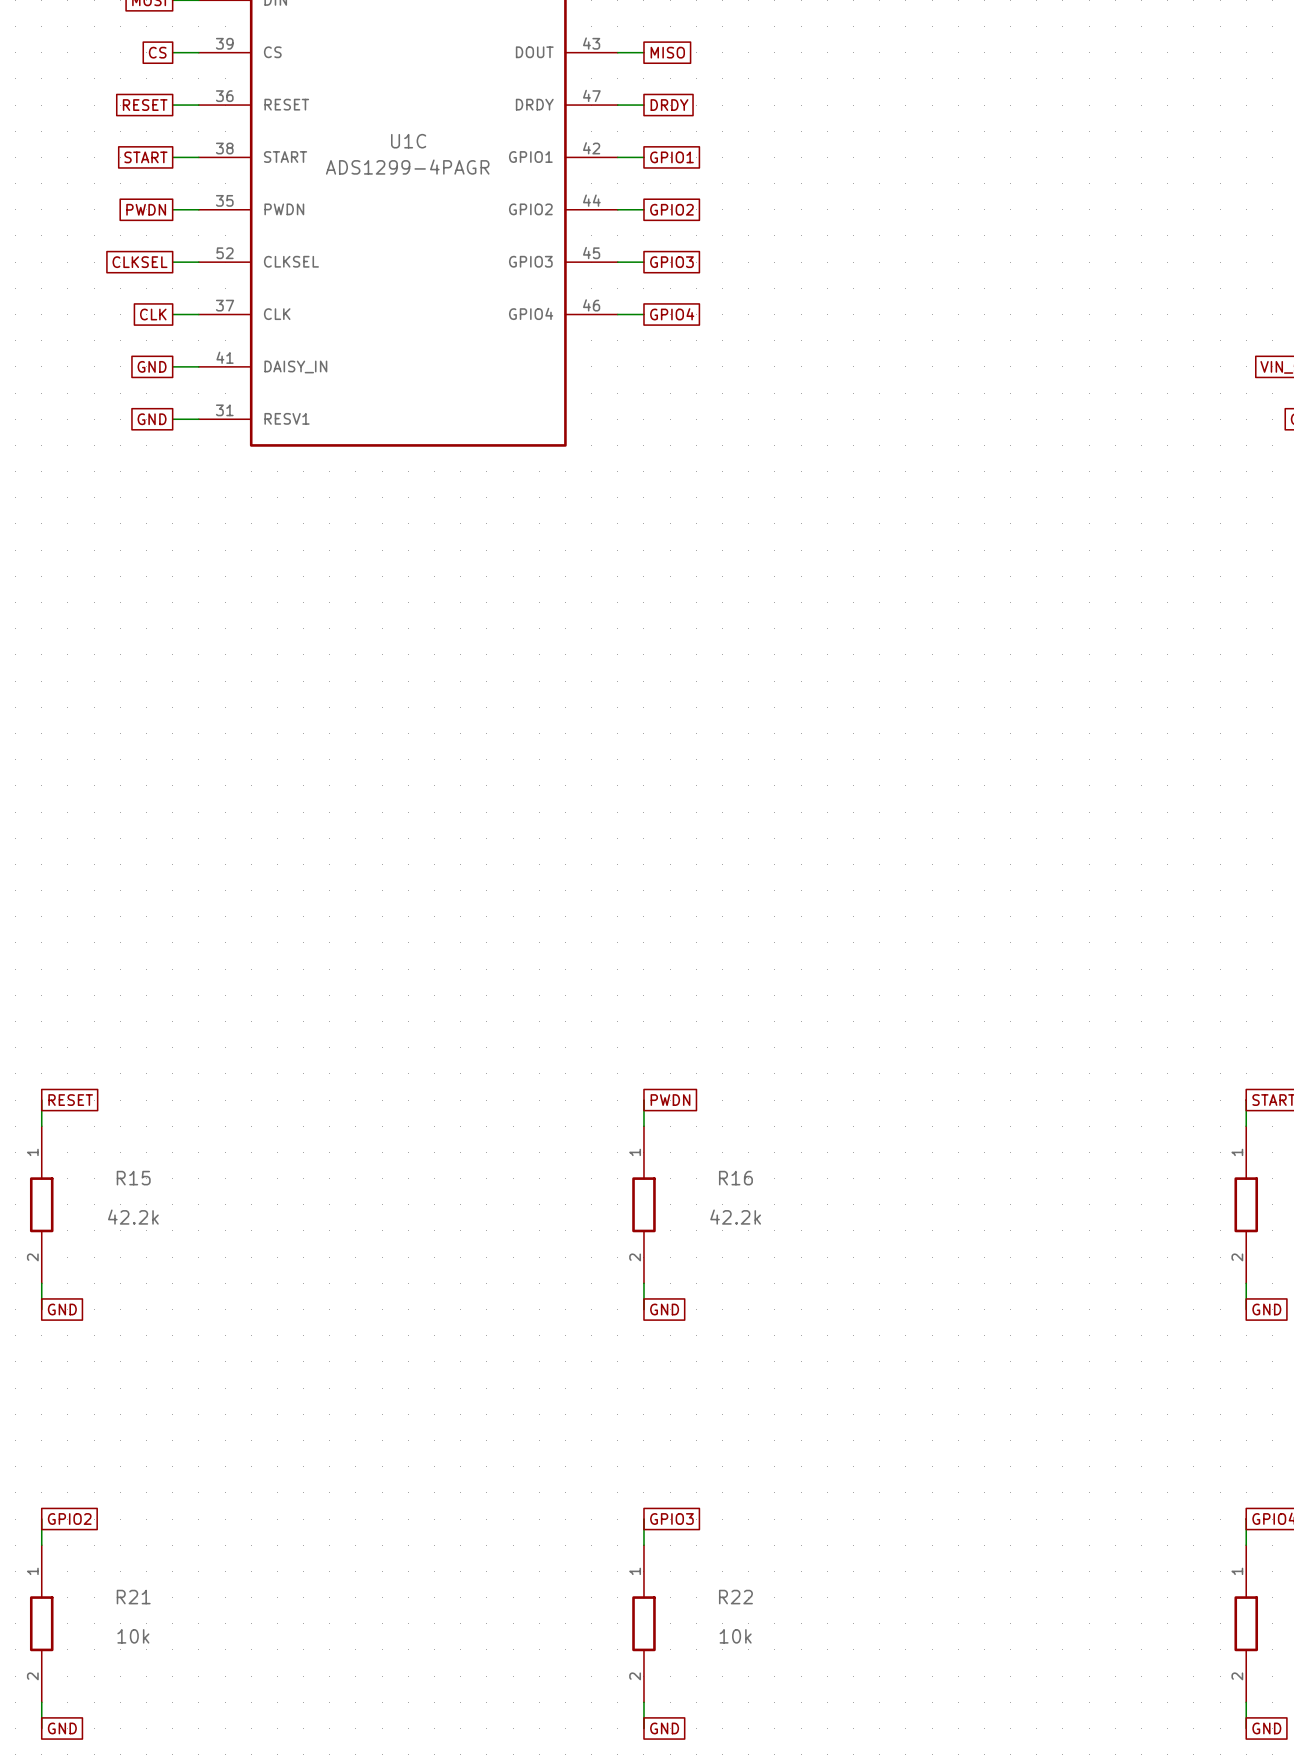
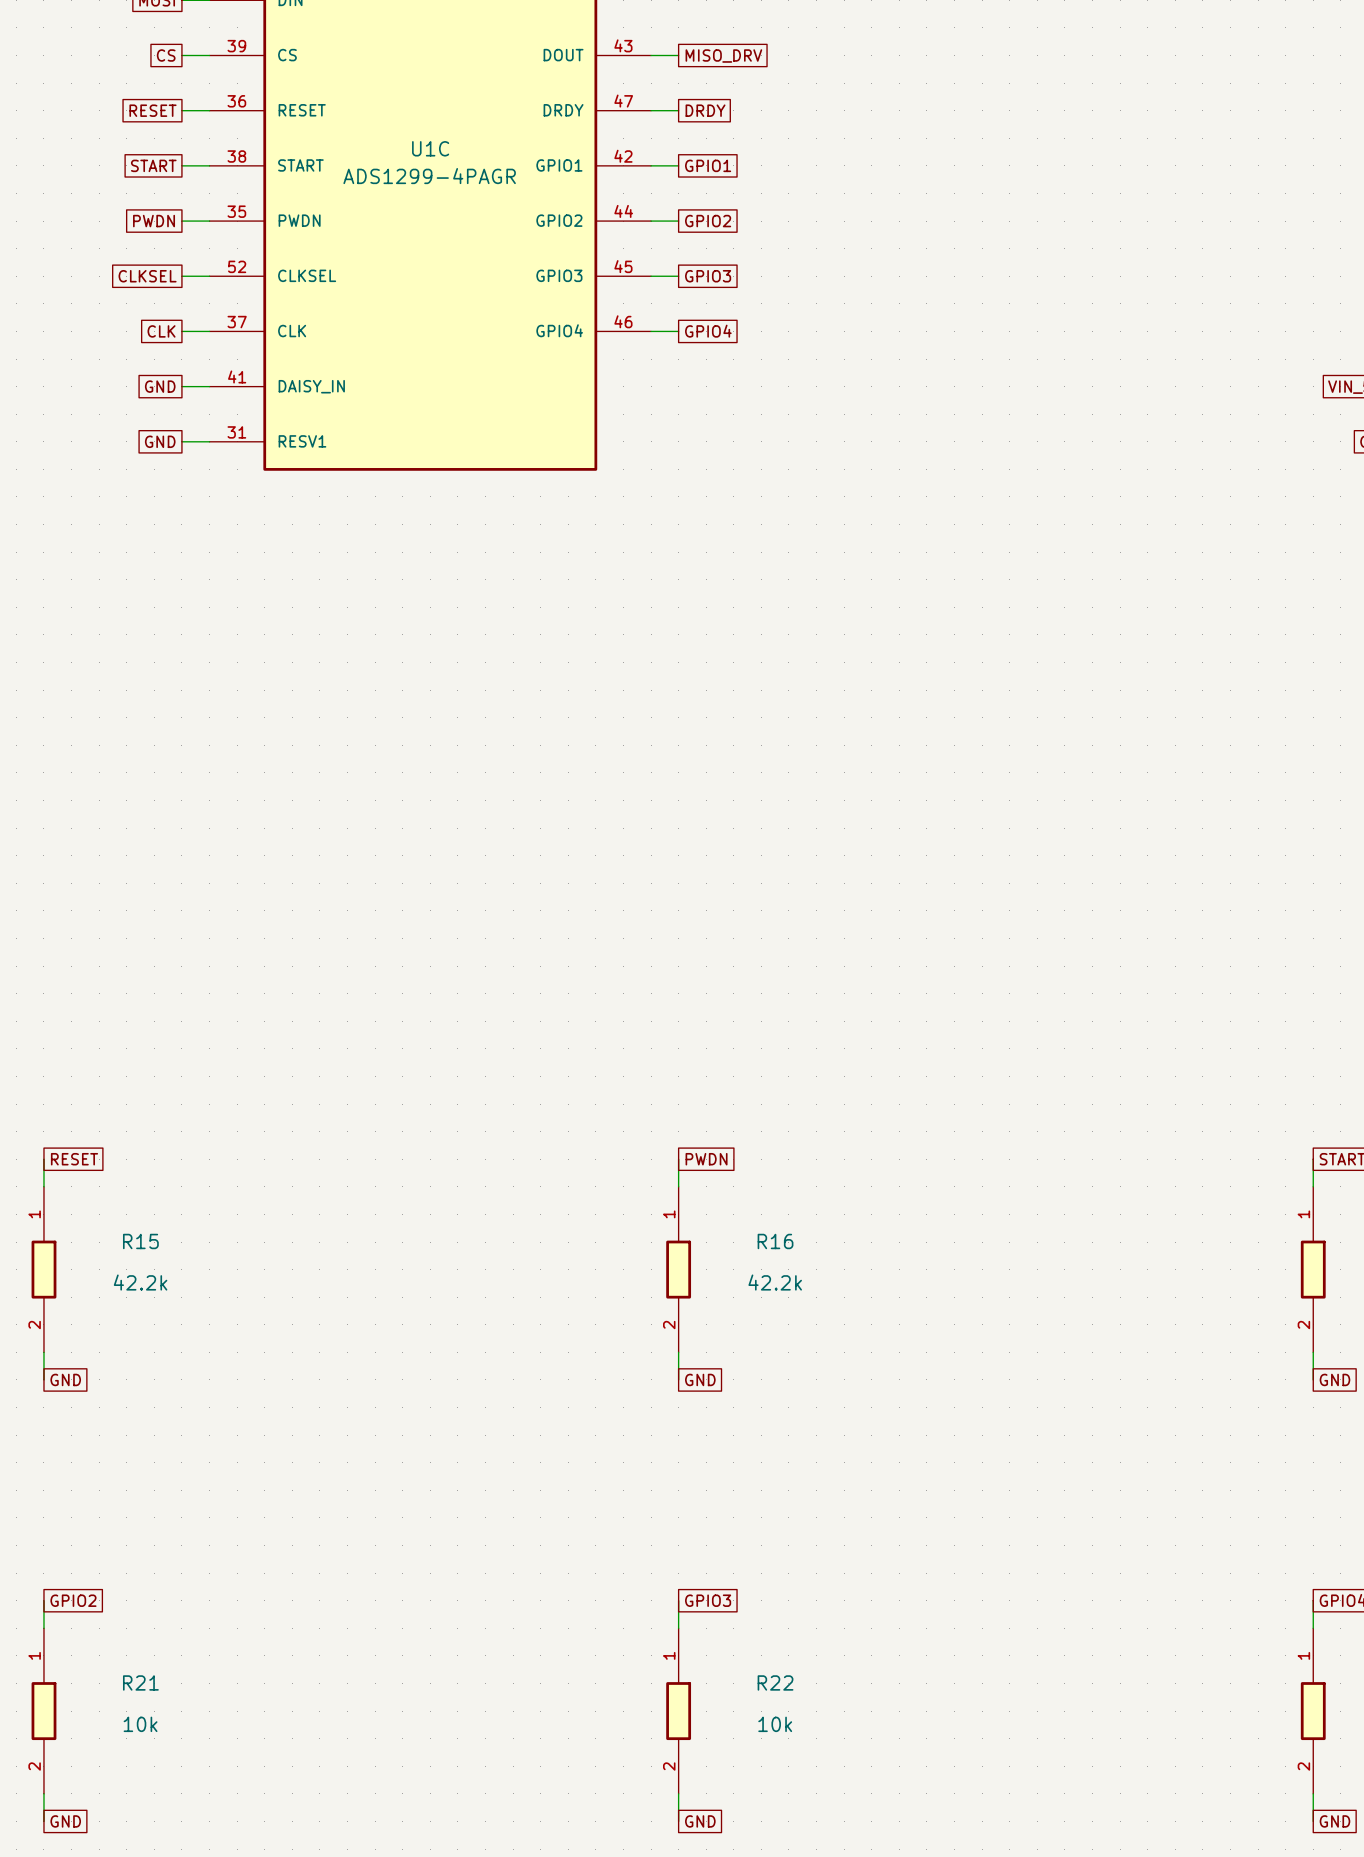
global label: MISO (667, 52) -> MISO_DRV (723, 56)

